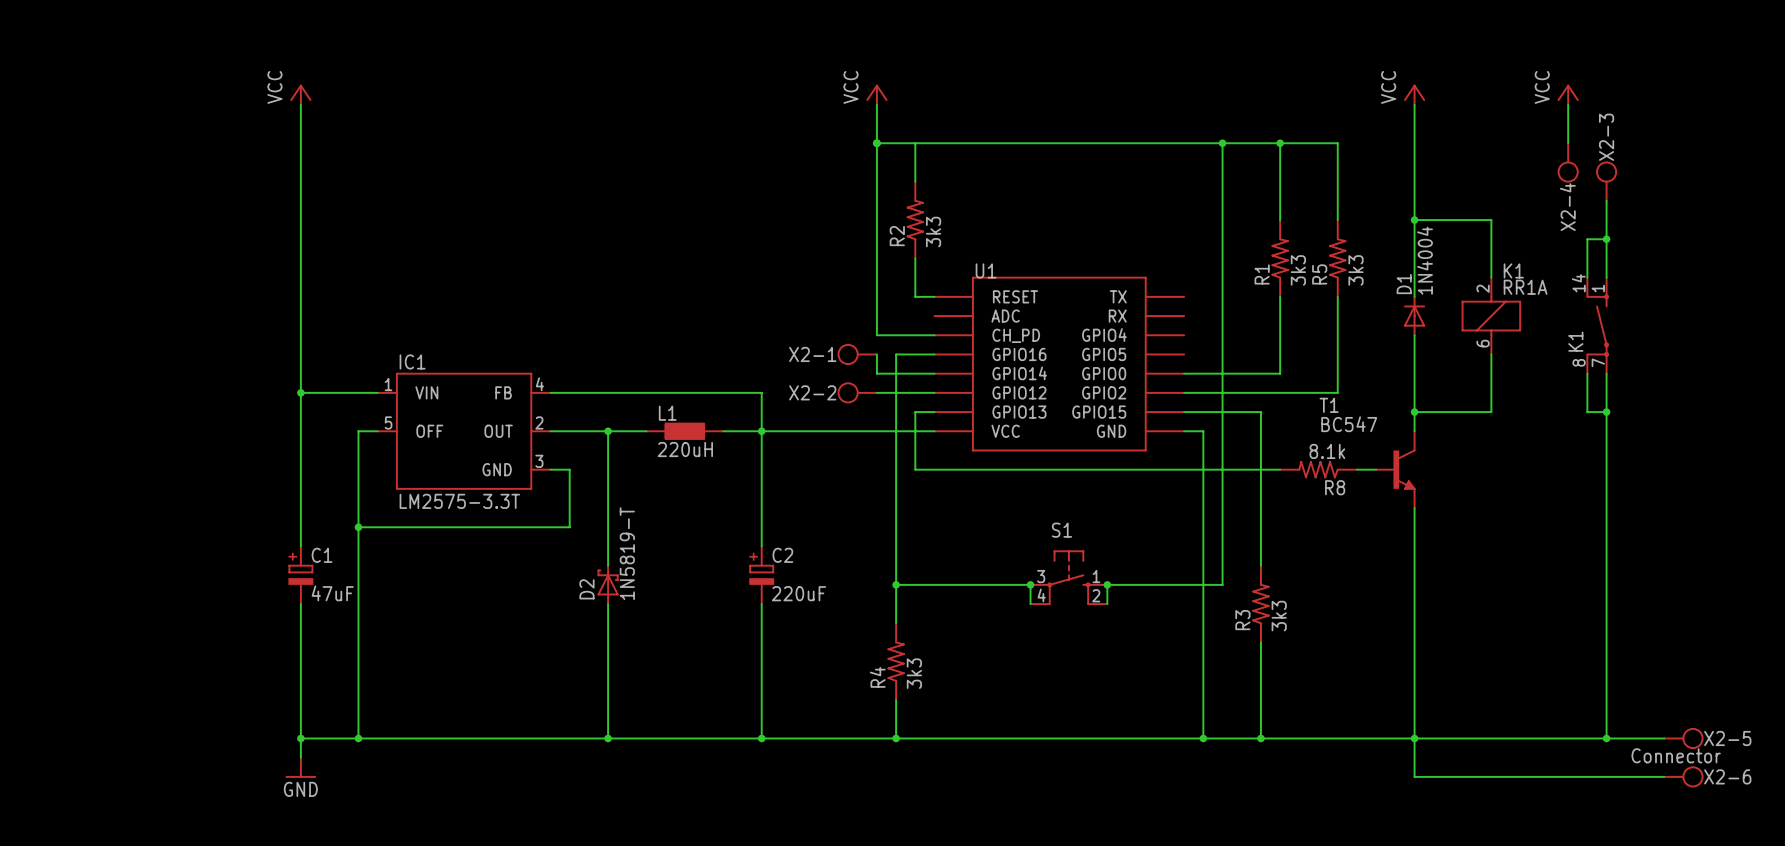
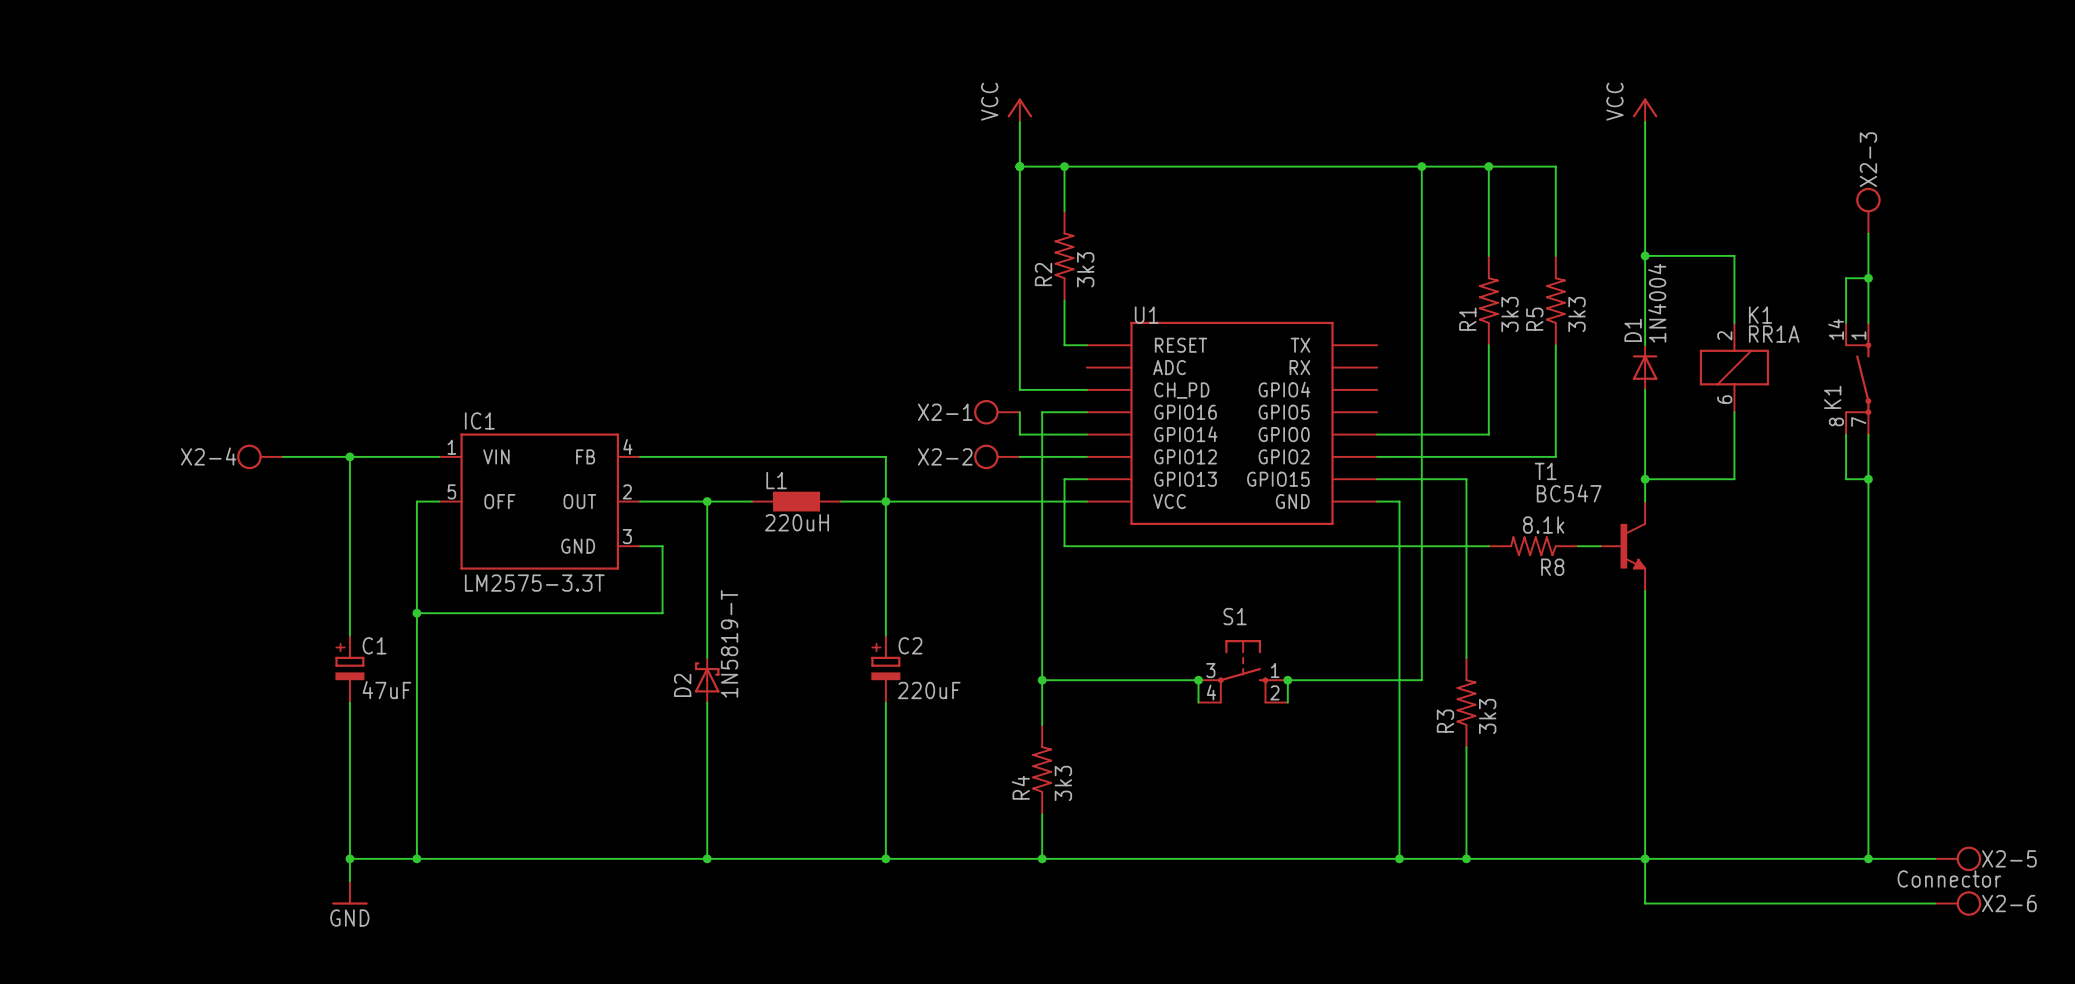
power symbol: VCC (300, 94) -> none
power symbol: VCC (1568, 94) -> none
wire: (300, 104) (300, 392) -> (282, 456) (349, 456)
wire: (1568, 104) (1568, 143) -> none
junction: none -> (1064, 166)
X2-4 position: (1568, 162) -> (260, 456)
X2-4 rotation: 0° (1568, 172) -> 90° clockwise (249, 456)

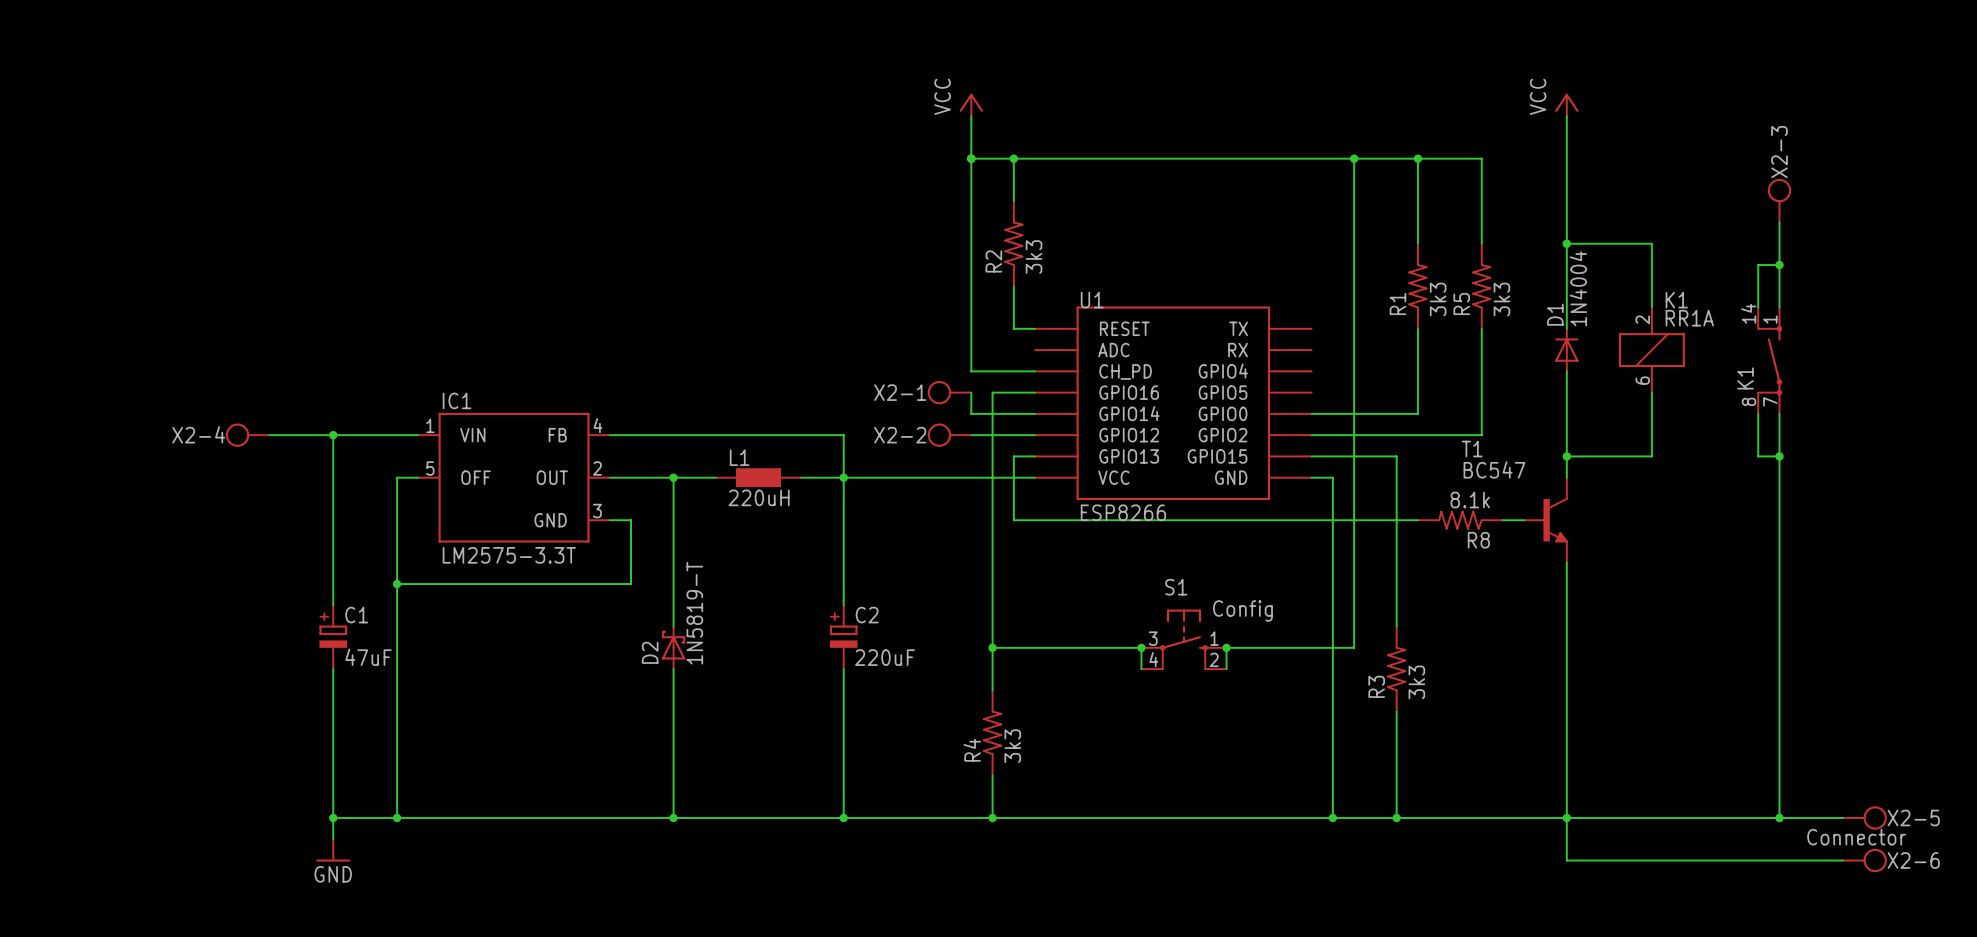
U1 value: none -> ESP8266 (1123, 512)
S1 value: none -> Config (1242, 610)

